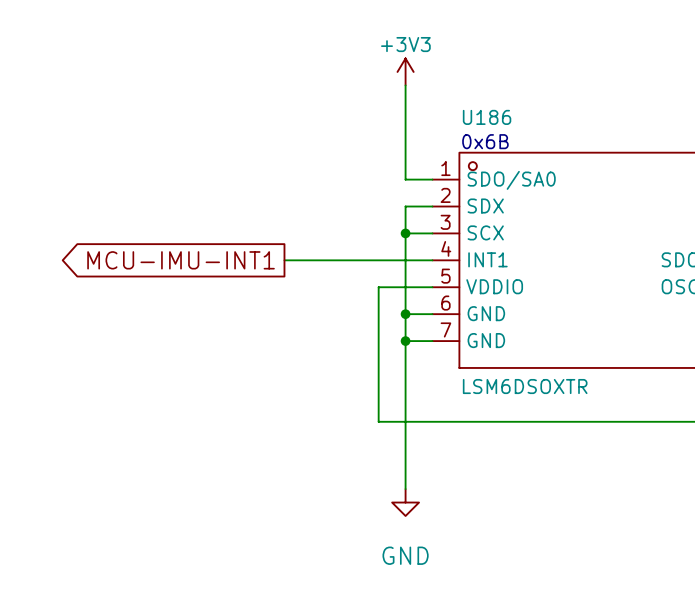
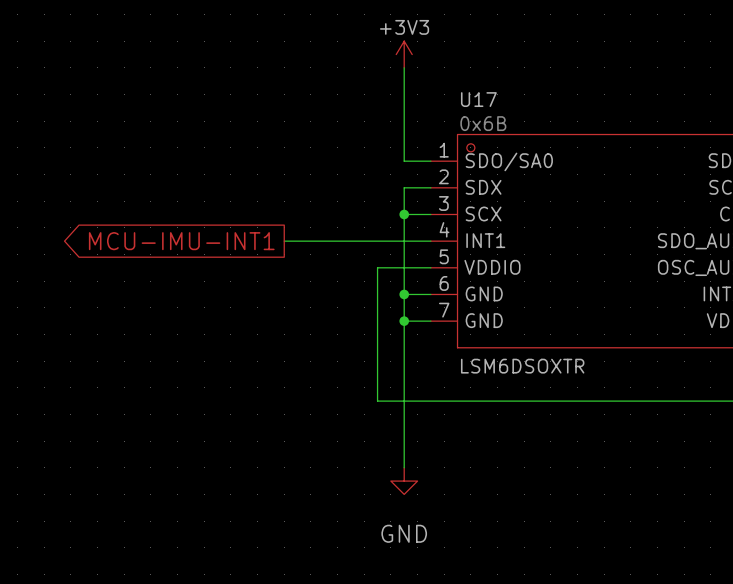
U186 name: U186 (487, 117) -> U17 (478, 99)

